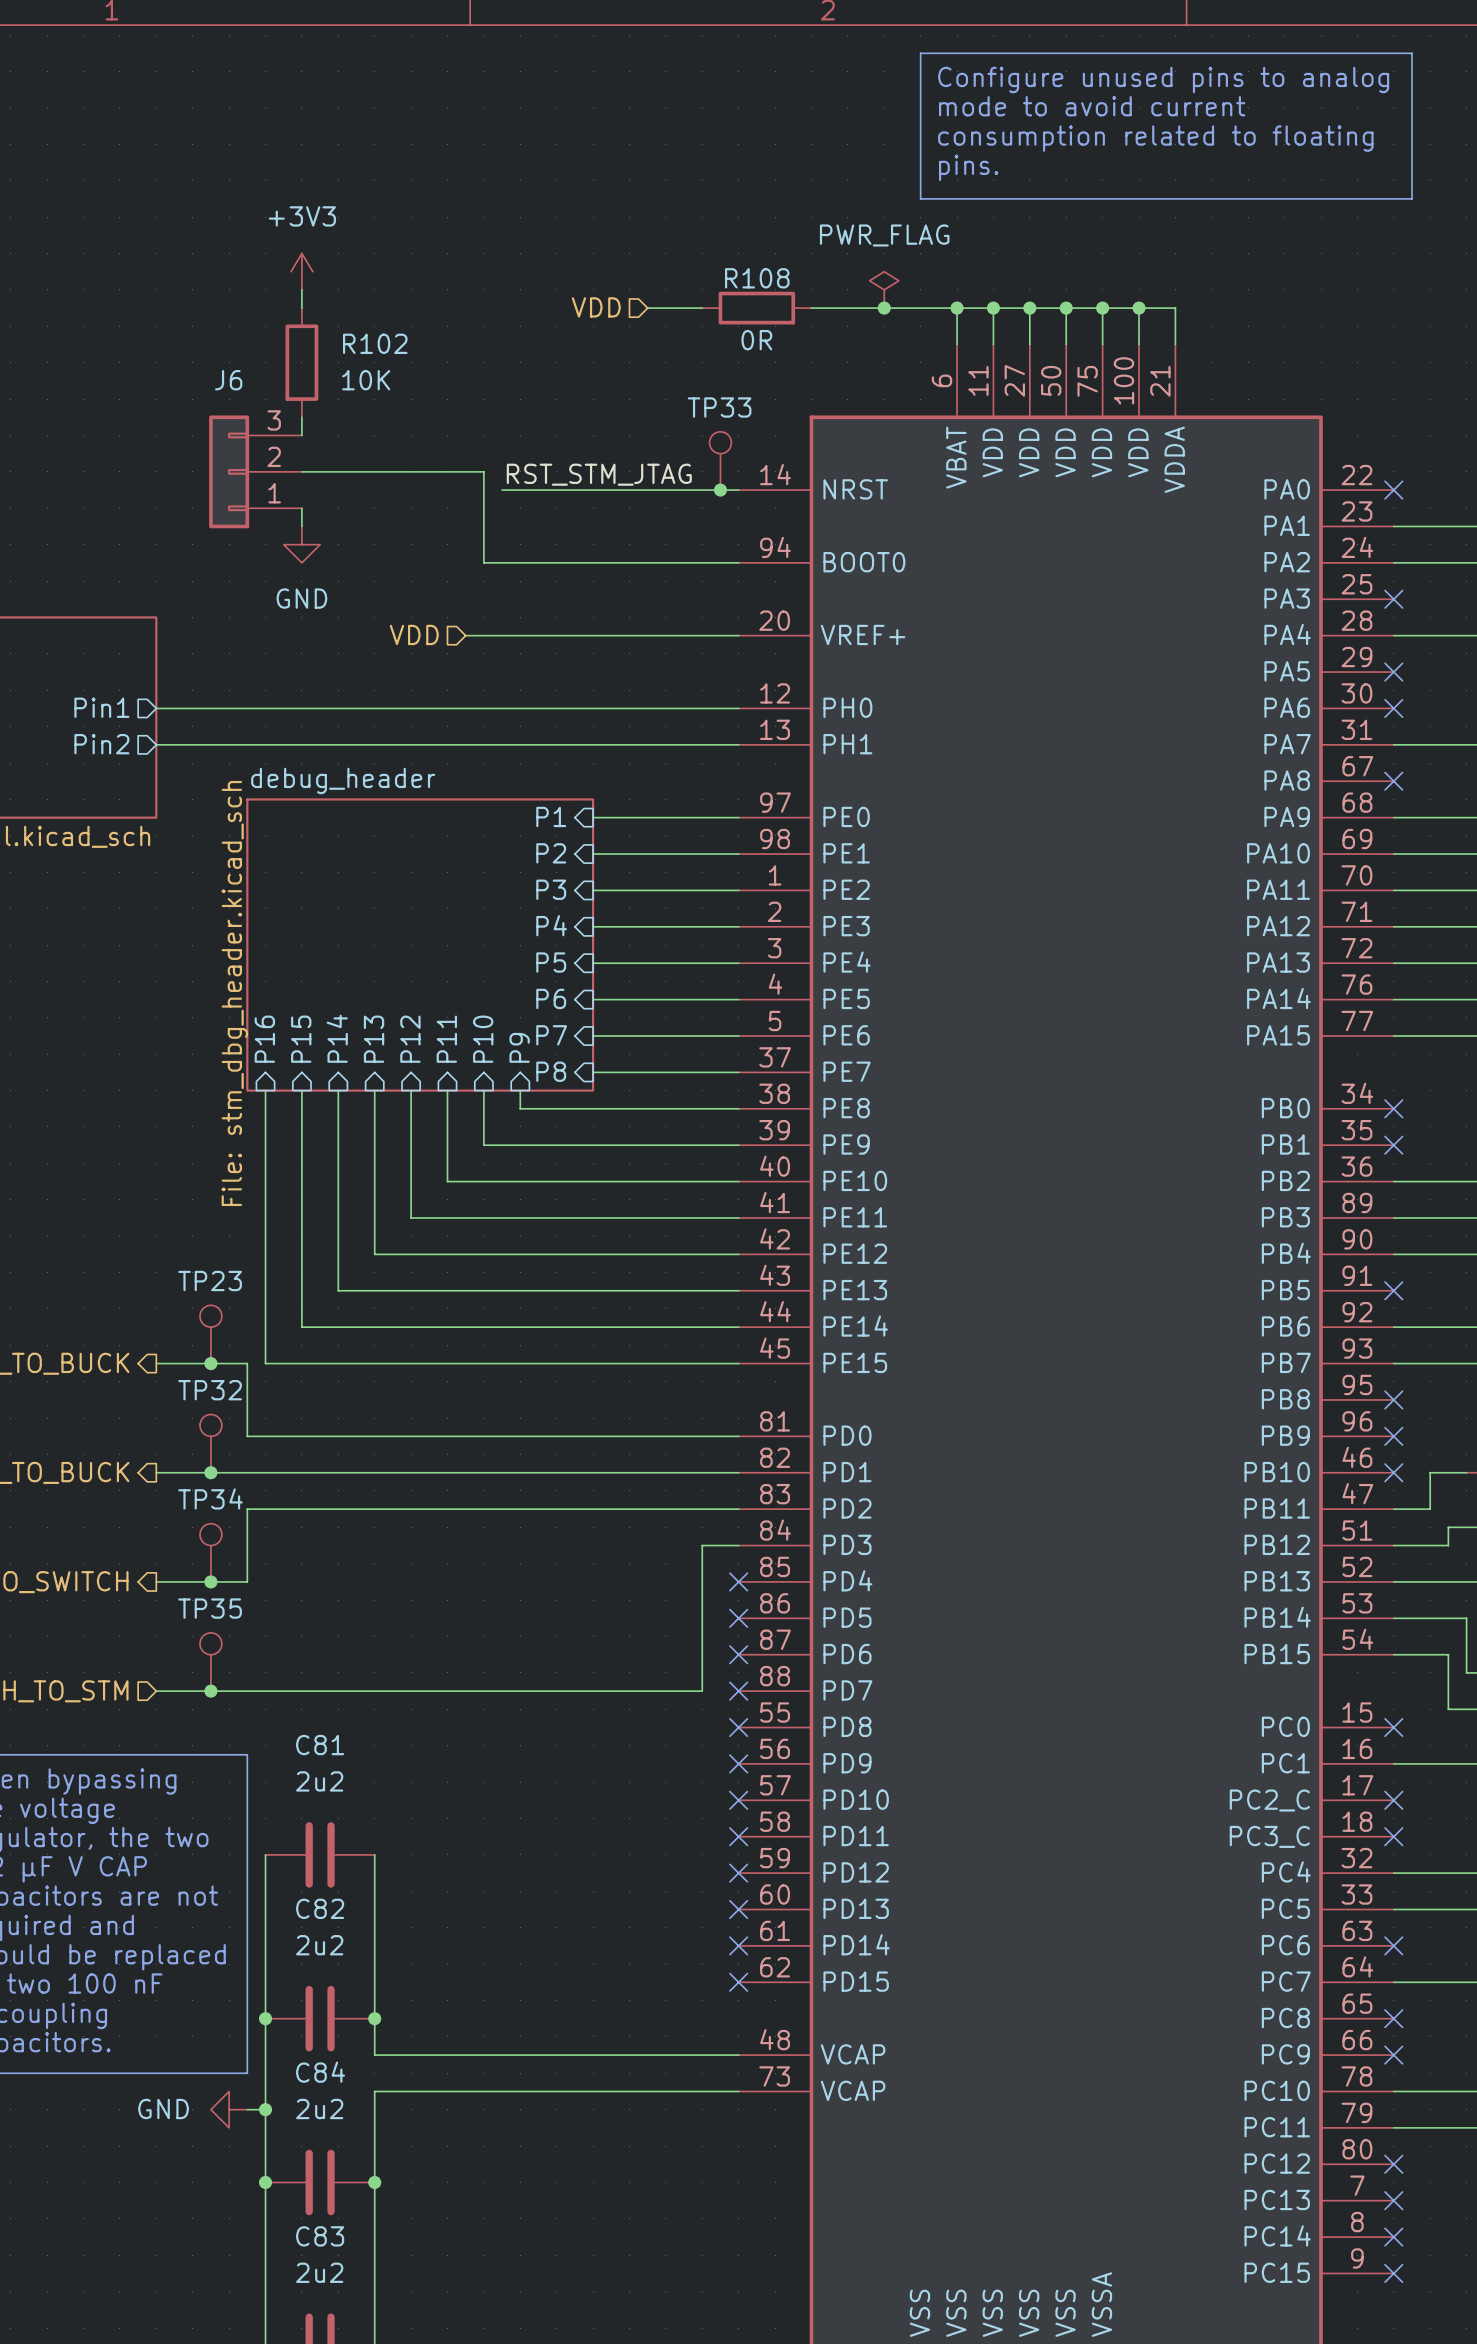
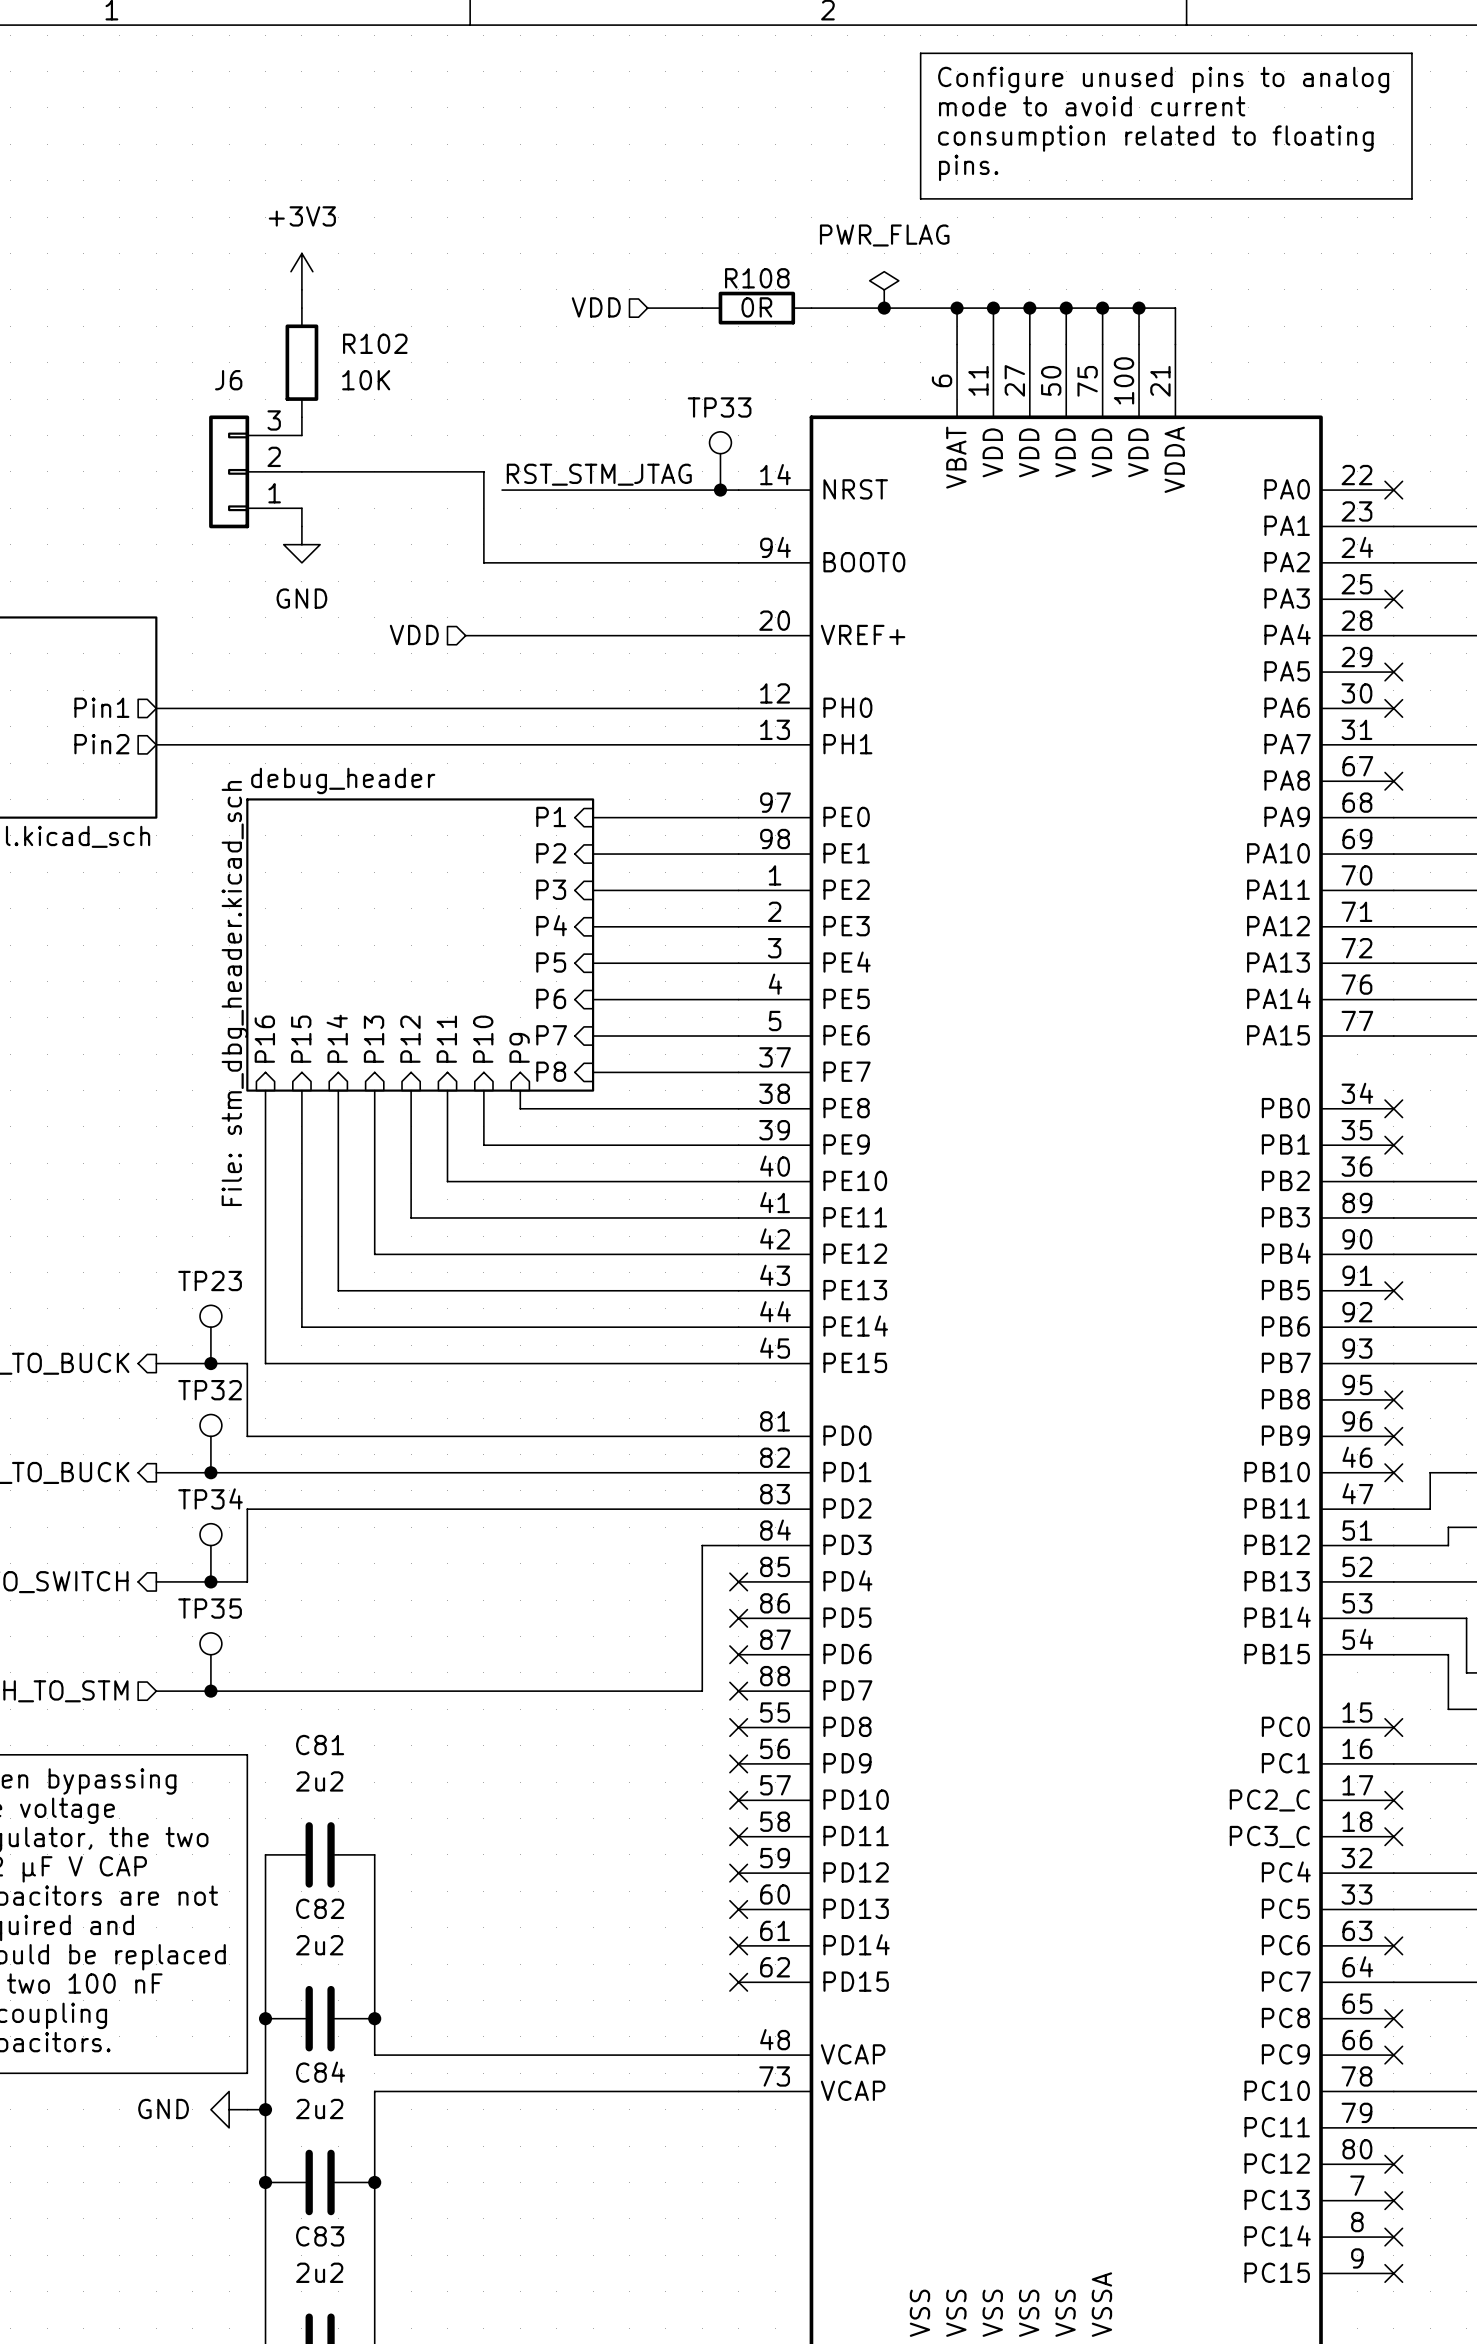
R108 value position: 0R (756, 340) -> 0R (756, 307)

